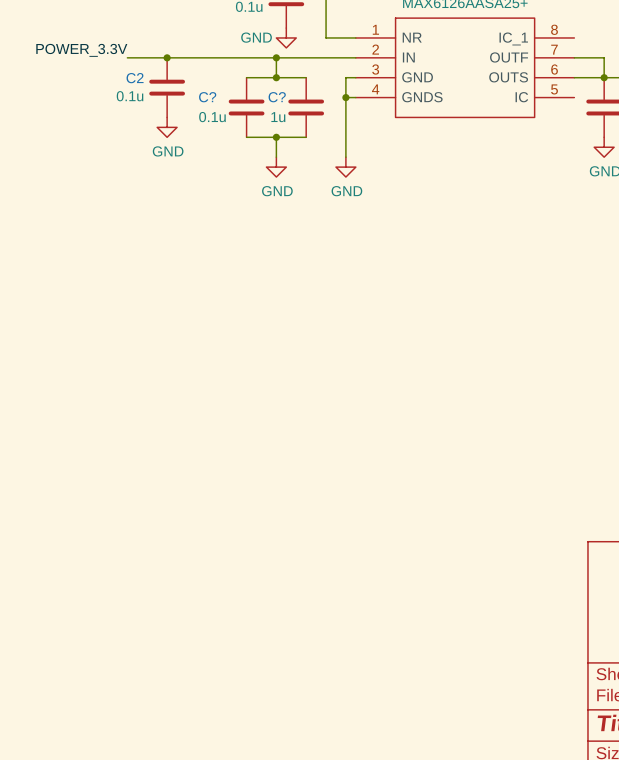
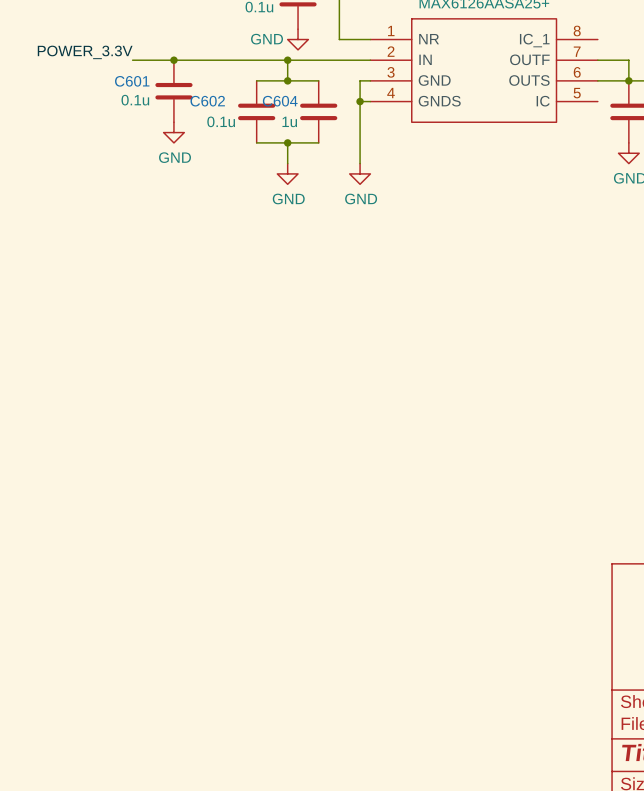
C2 name: C2 (135, 78) -> C601 (132, 81)
C? name: C? (207, 97) -> C602 (207, 101)
C? name: C? (277, 97) -> C604 (280, 101)

